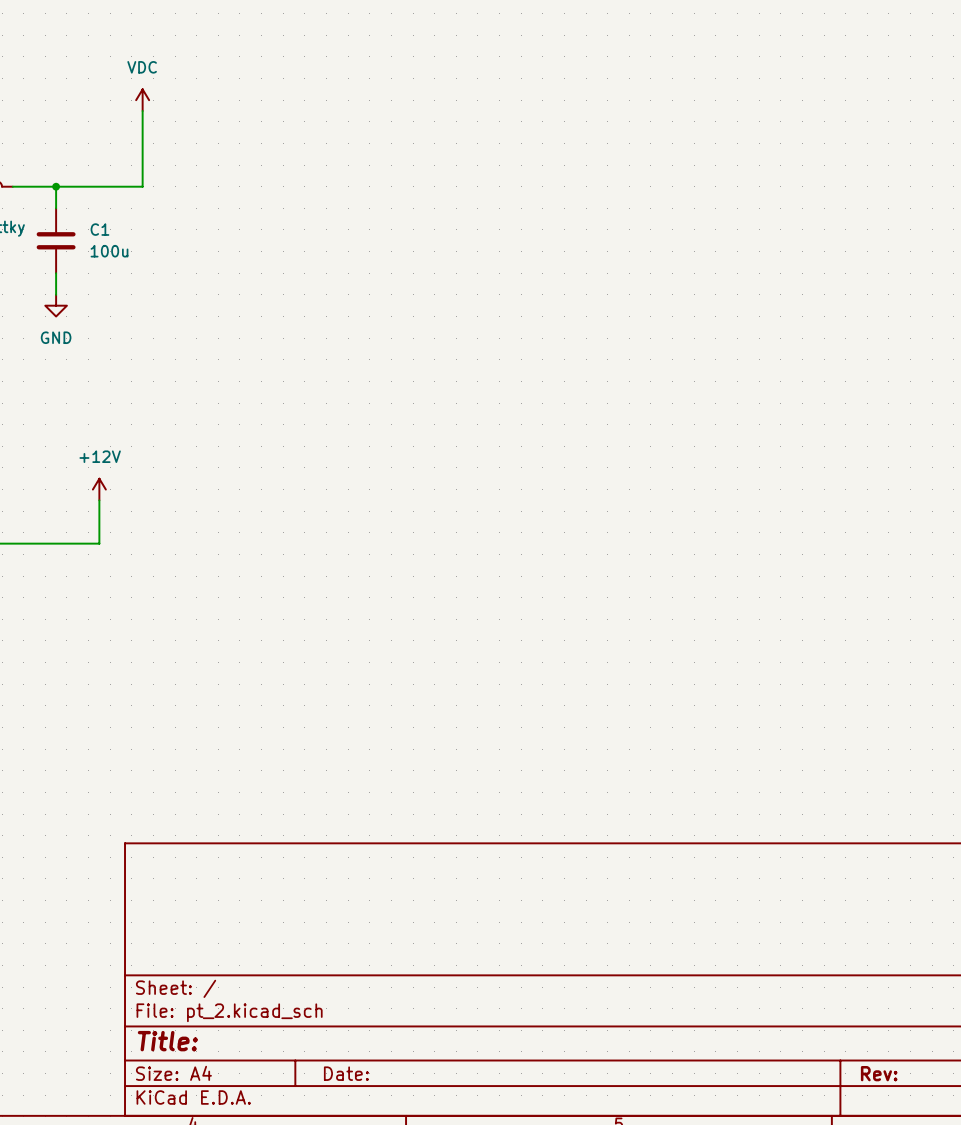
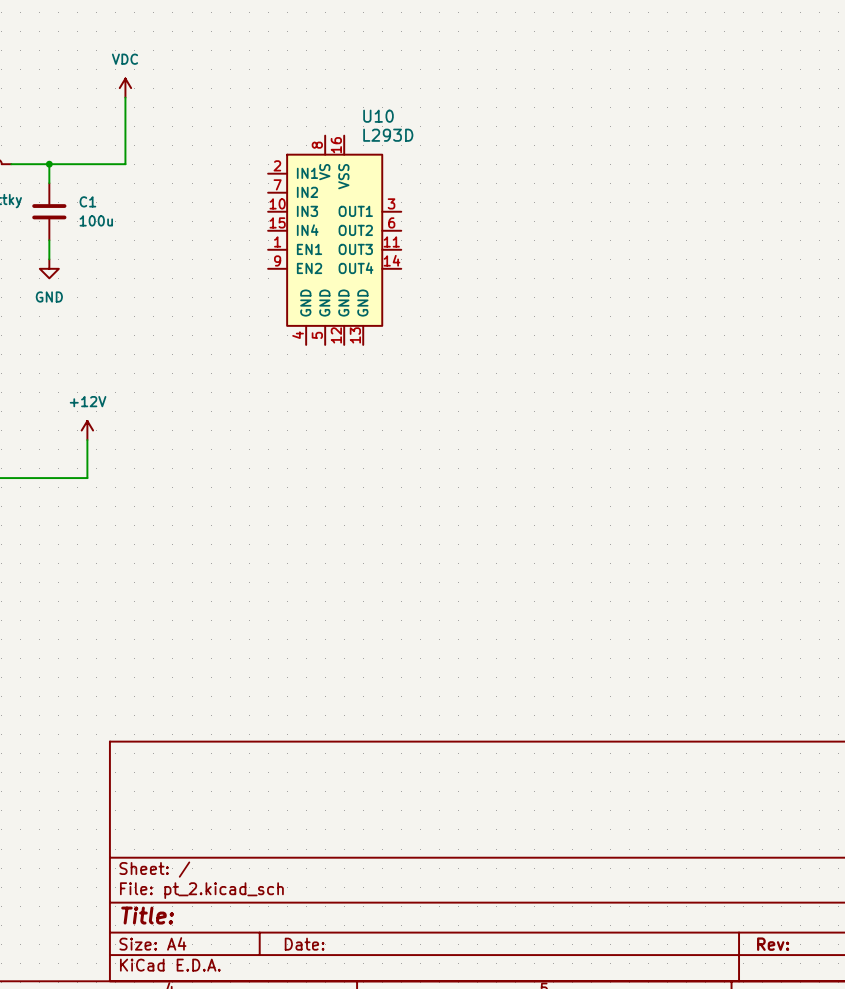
U10: none -> L293D (334, 240)

